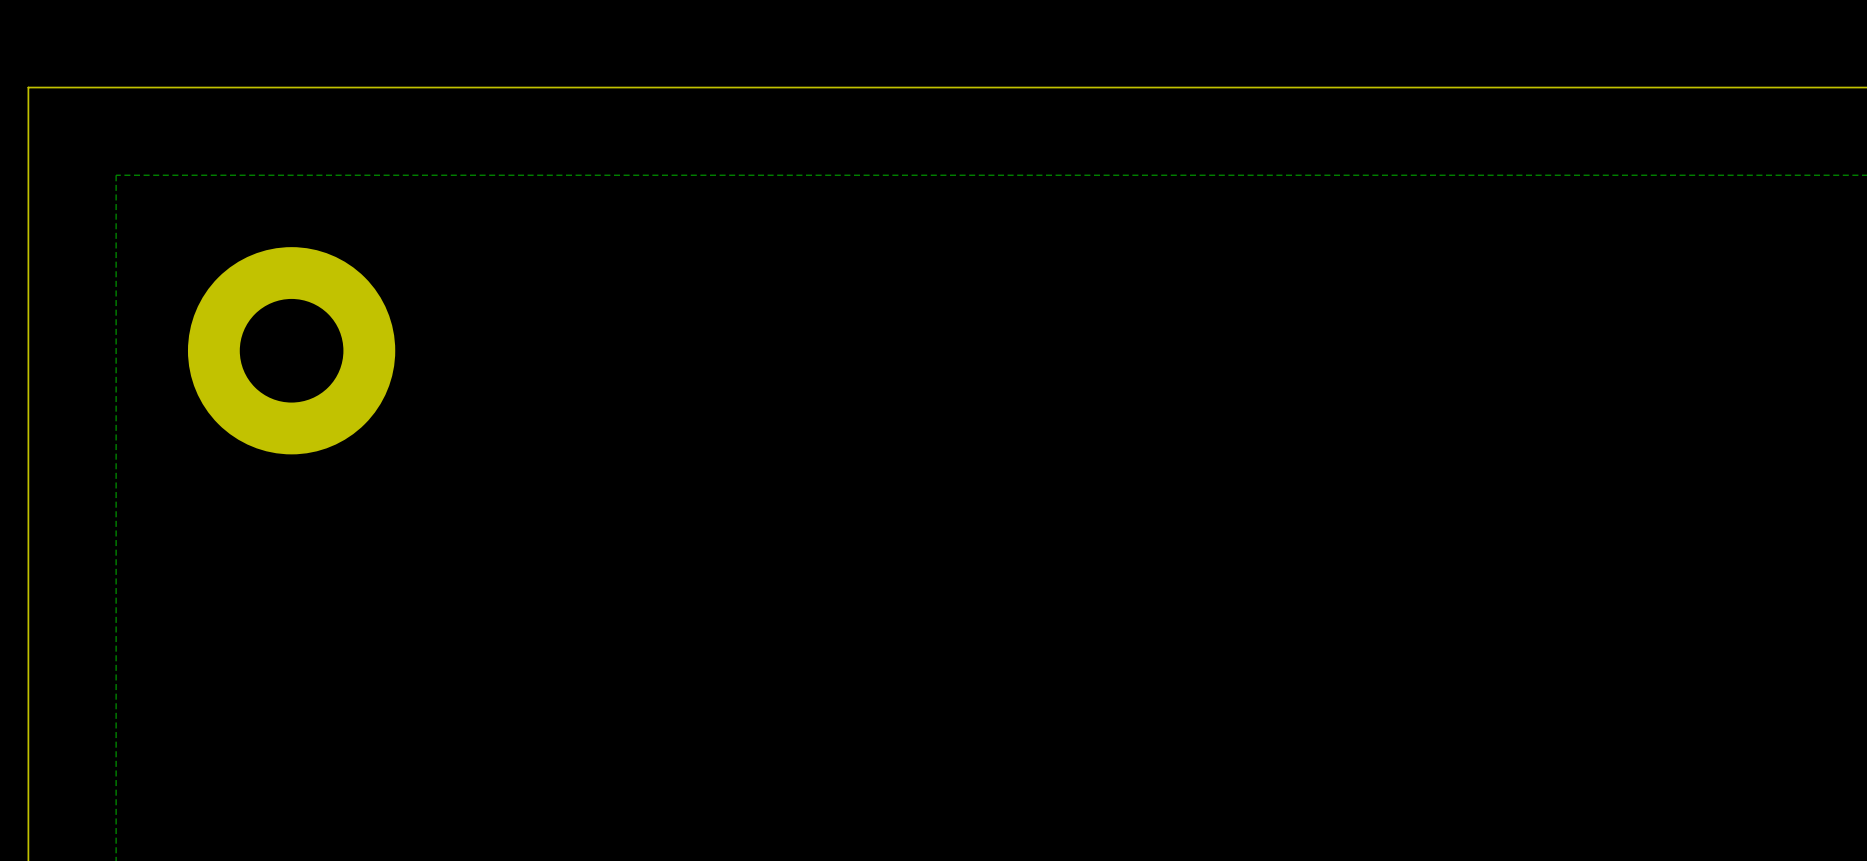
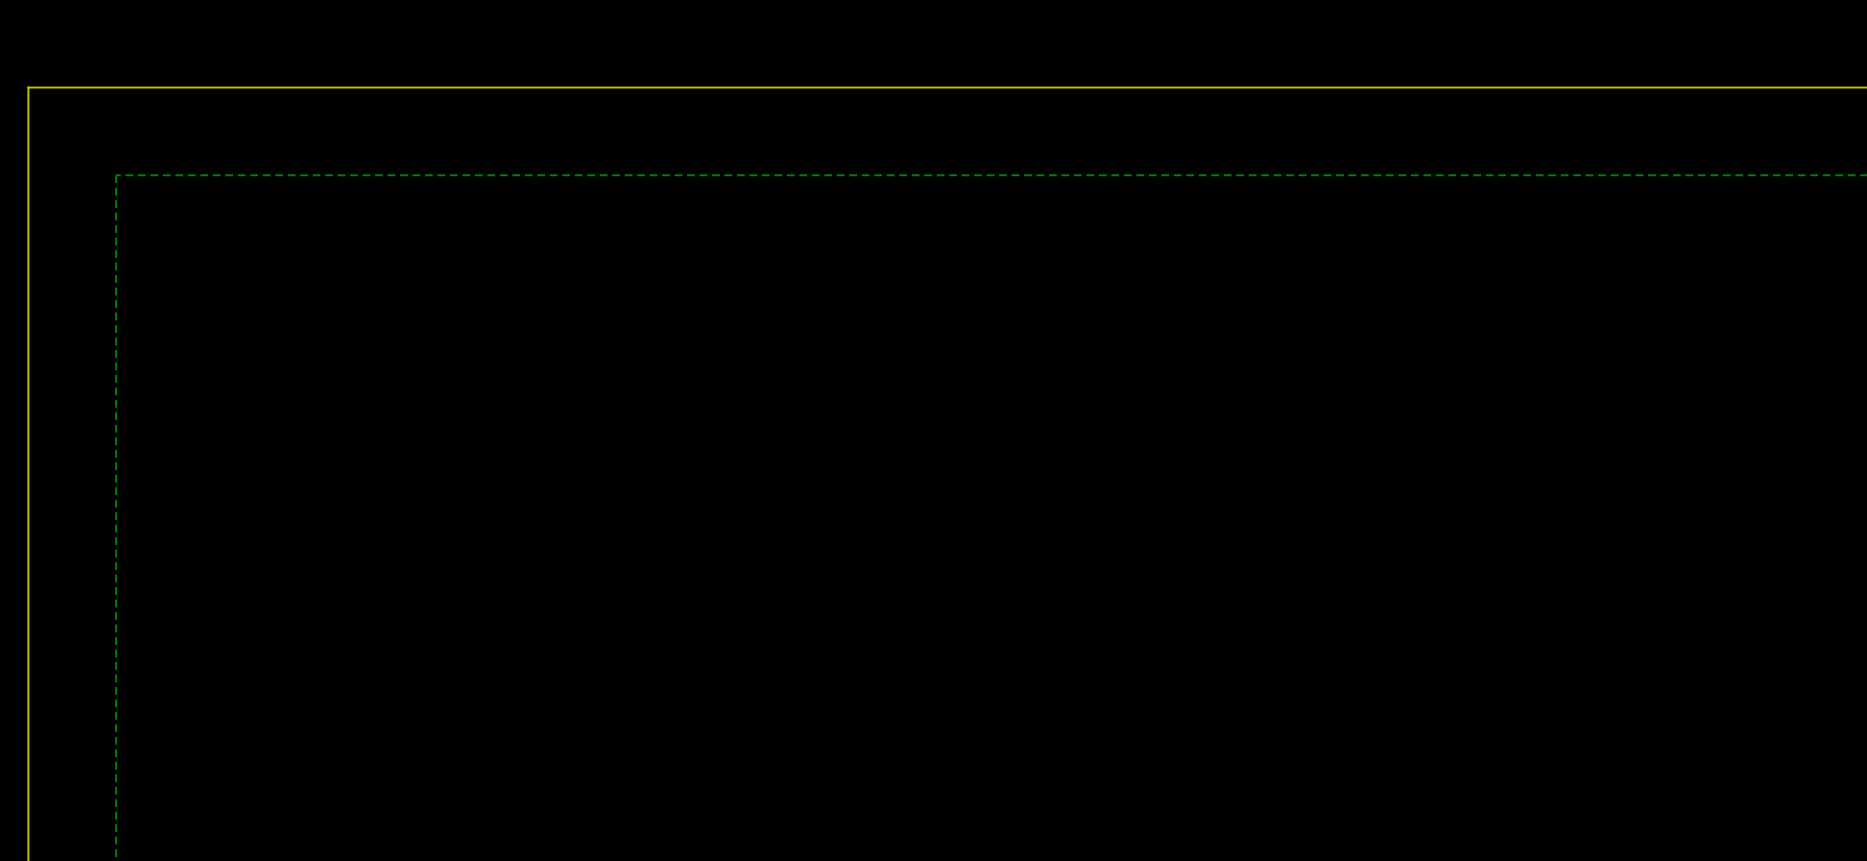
part: (291, 350) -> none

